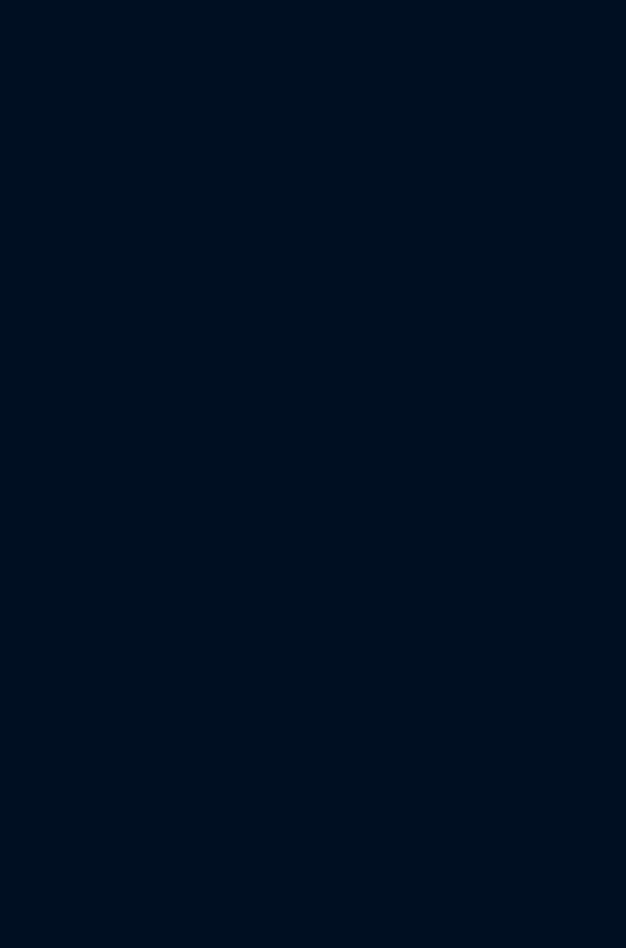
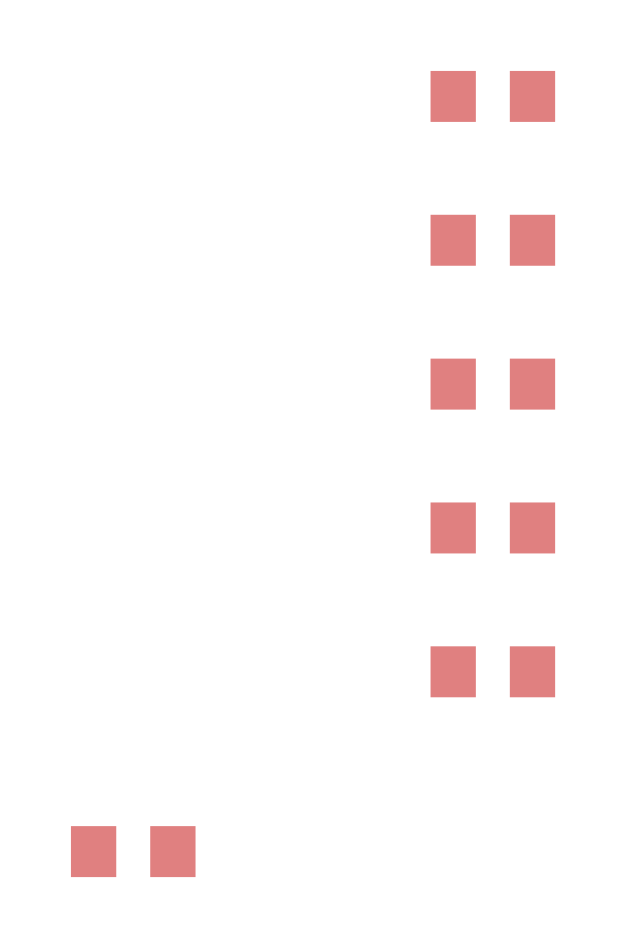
part: none -> (492, 96)
part: none -> (492, 240)
part: none -> (492, 384)
part: none -> (492, 527)
part: none -> (492, 671)
part: none -> (133, 851)

